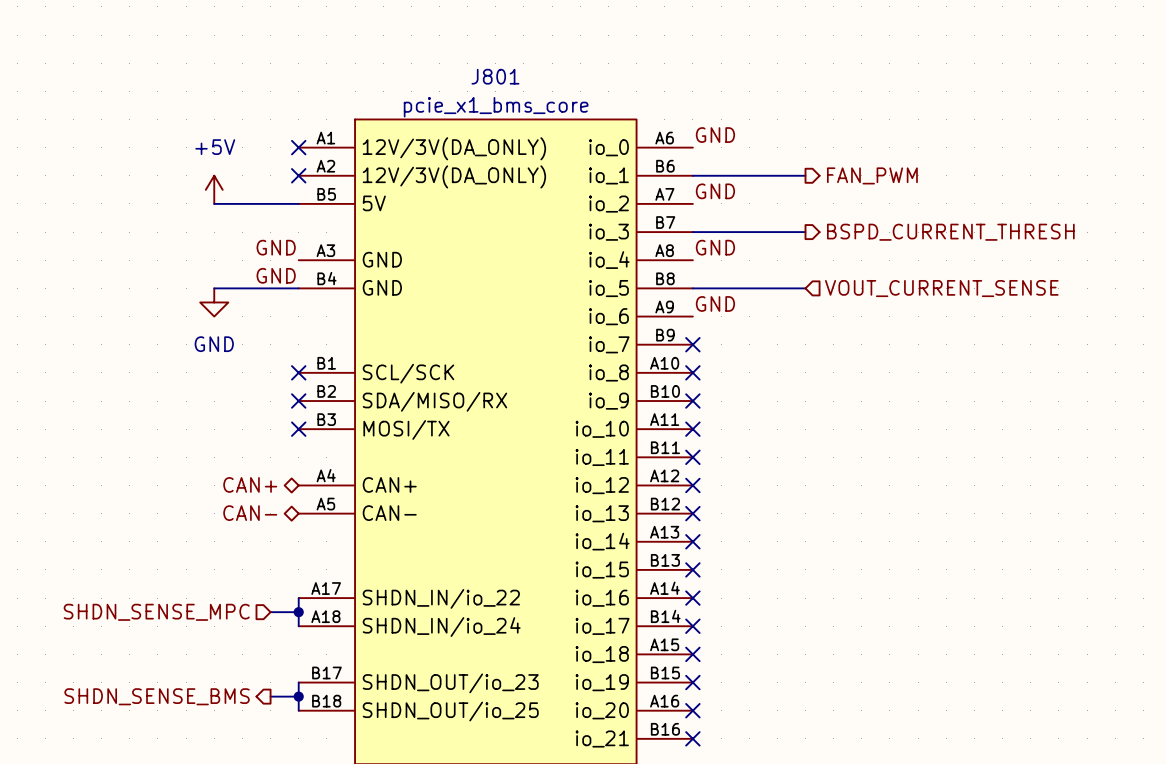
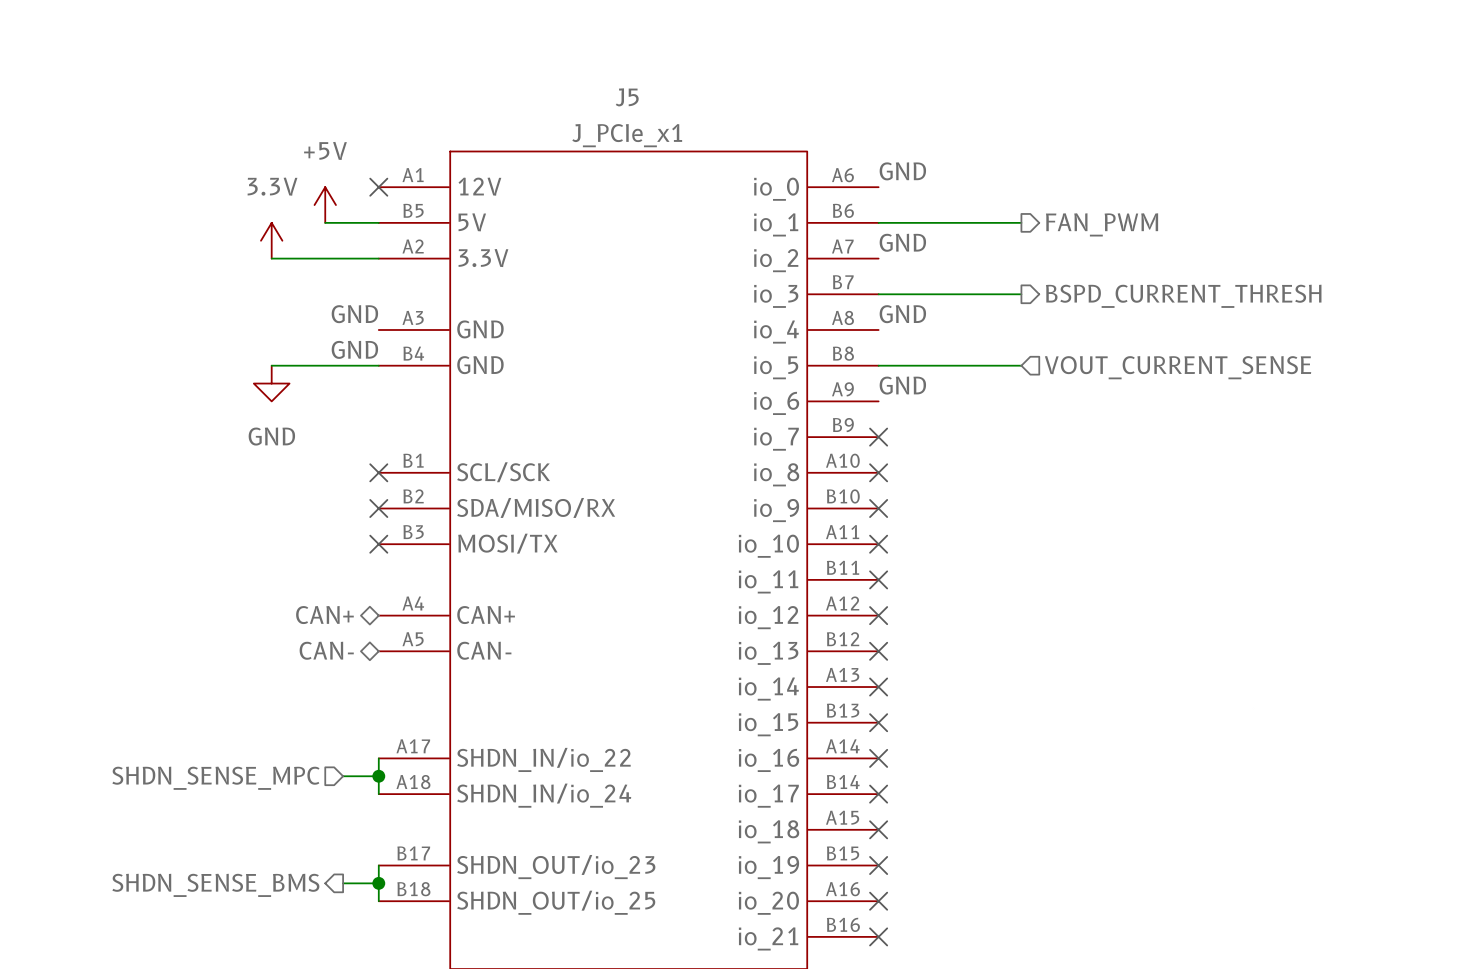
J801 name: J801 (495, 76) -> J5 (627, 97)
J801 value: pcie_x1_bms_core (496, 107) -> J_PCIe_x1 (627, 135)
J801 pin name: 12V/3V(DA_ONLY) (454, 148) -> 12V (479, 186)
power symbol: none -> +5V (325, 205)
J801 pin number: A2 (325, 166) -> B5 (413, 210)
wire: none -> (325, 222) (378, 222)
no-connect mark: (298, 175) -> none
J801 pin name: 12V/3V(DA_ONLY) (454, 176) -> 5V (472, 222)
power symbol: +5V (214, 189) -> 3.3V (271, 240)
J801 pin number: B5 (326, 194) -> A2 (413, 246)
J801 pin name: 5V (374, 203) -> 3.3V (483, 258)

